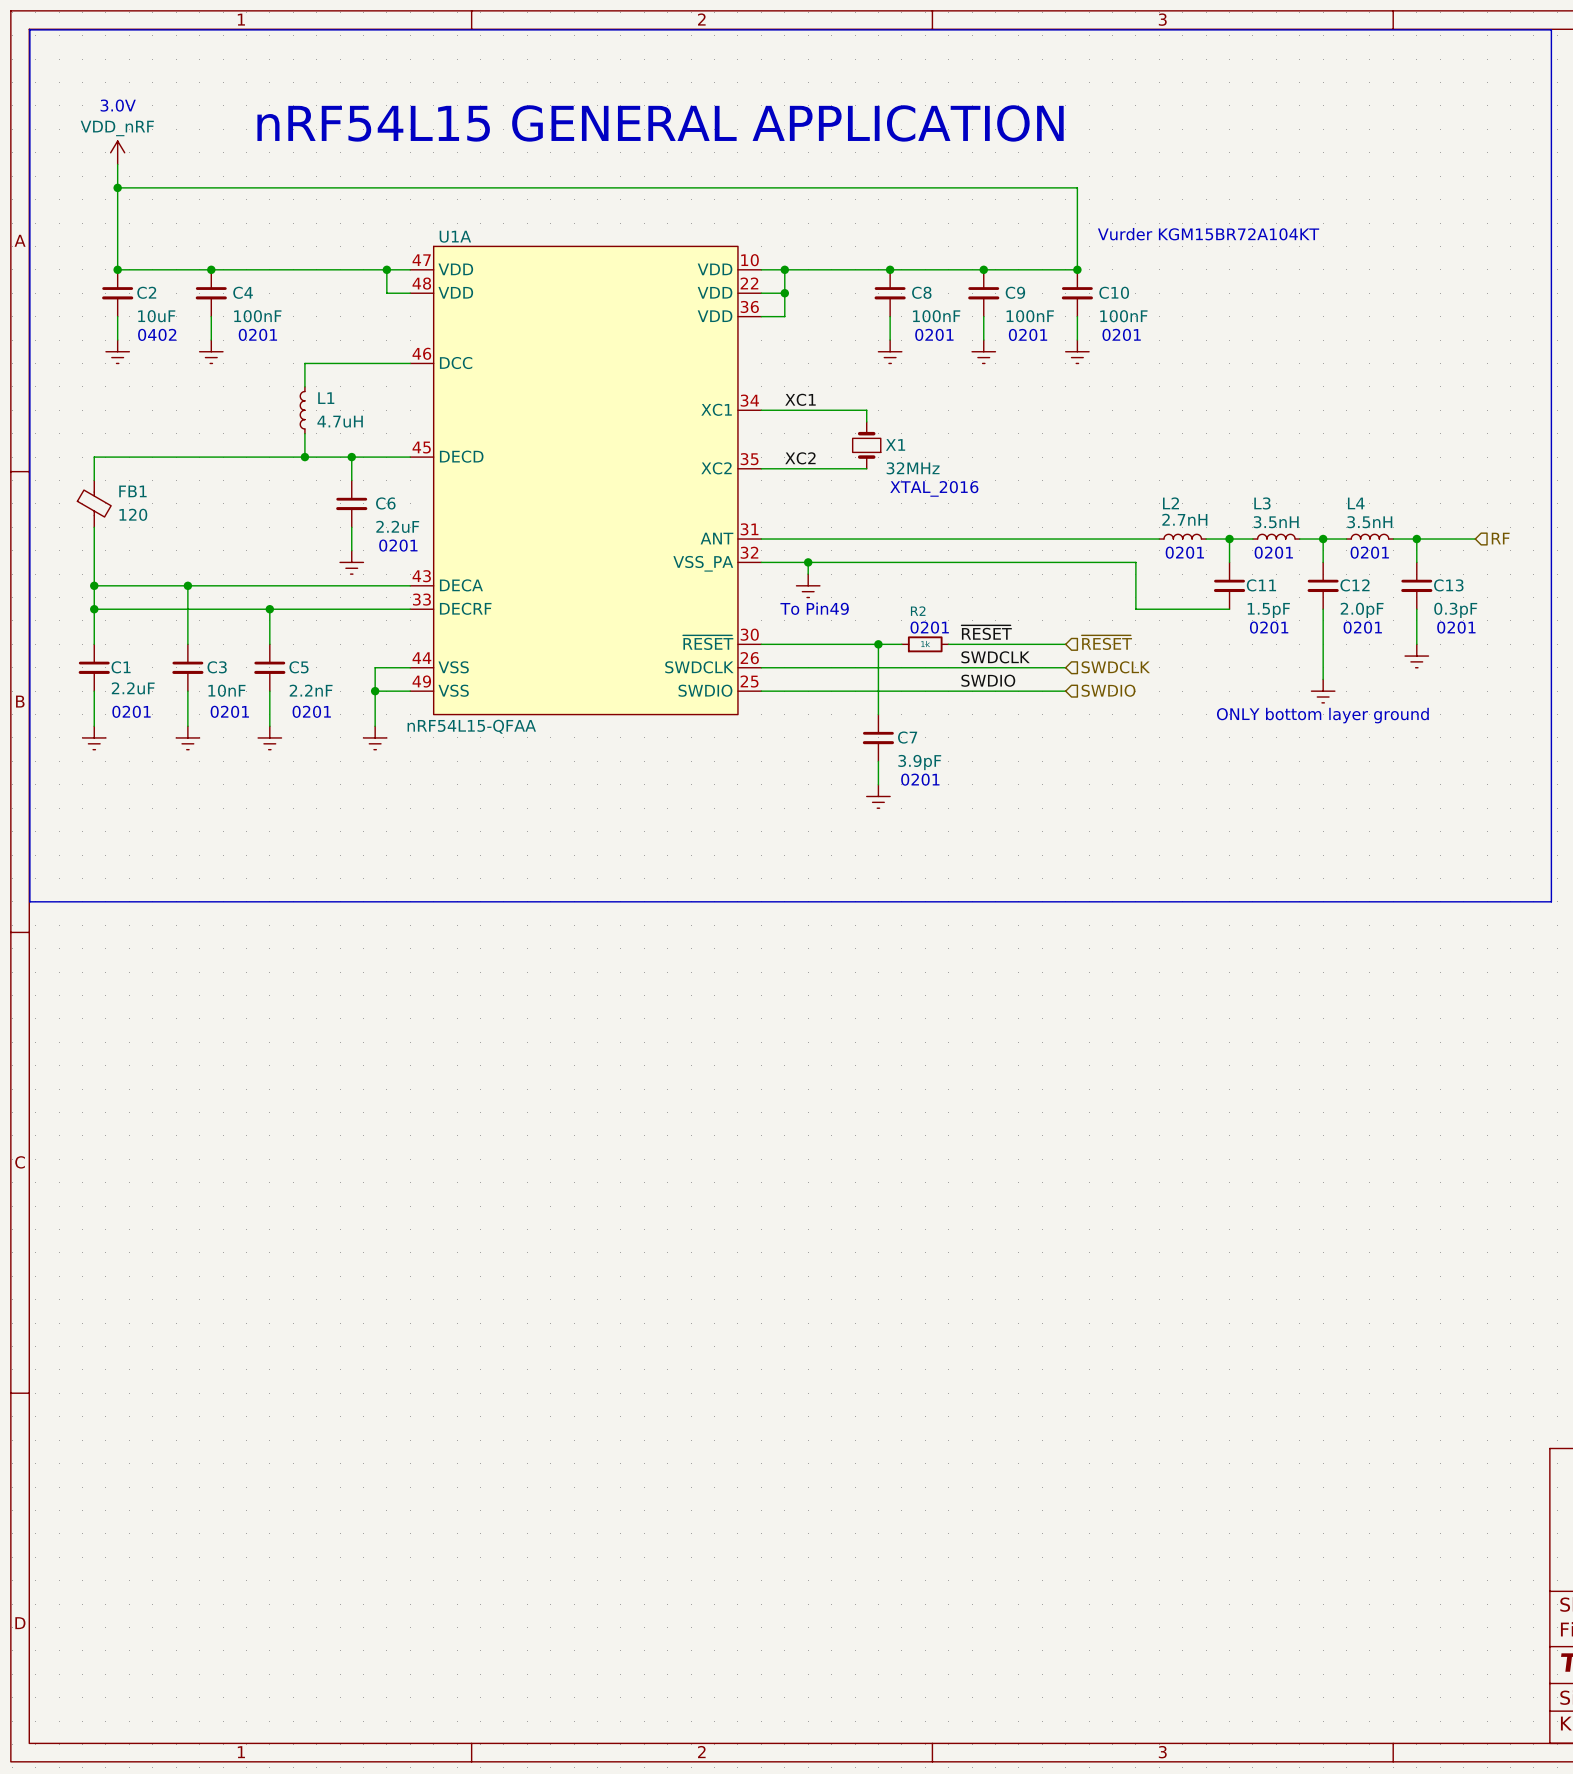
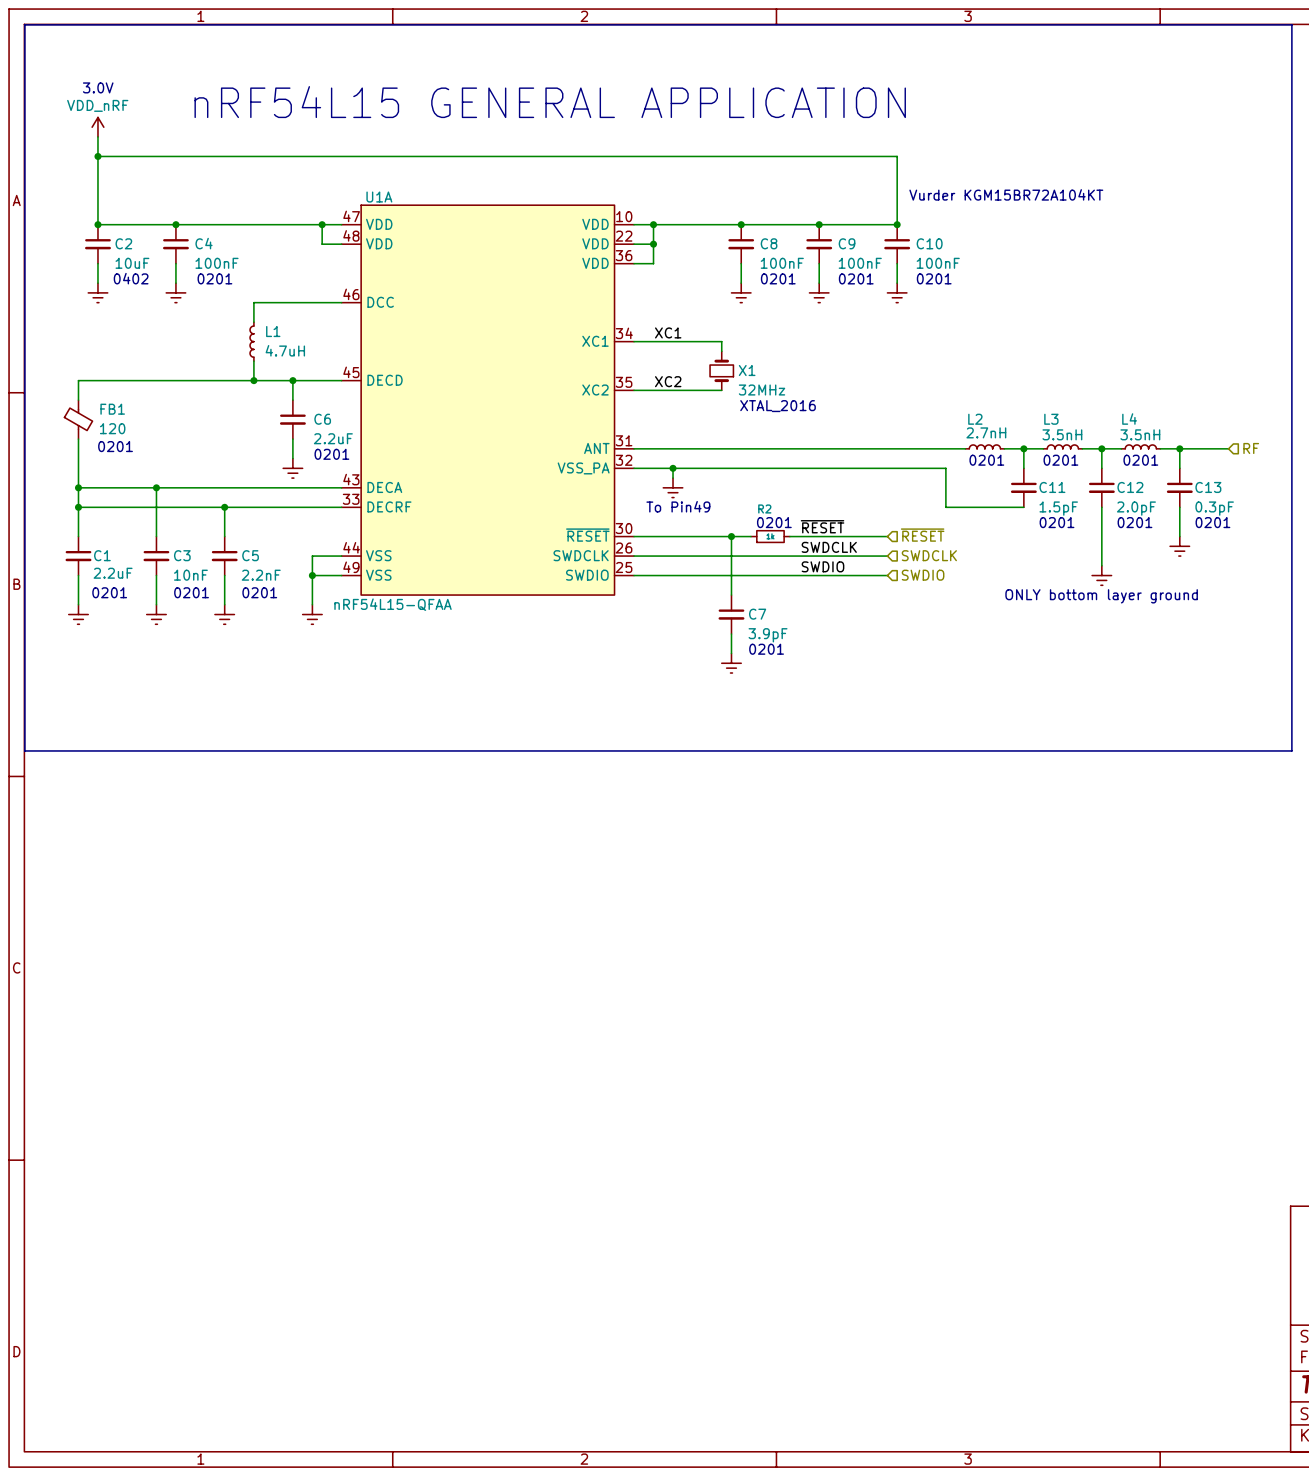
text: none -> 0201 (115, 446)

